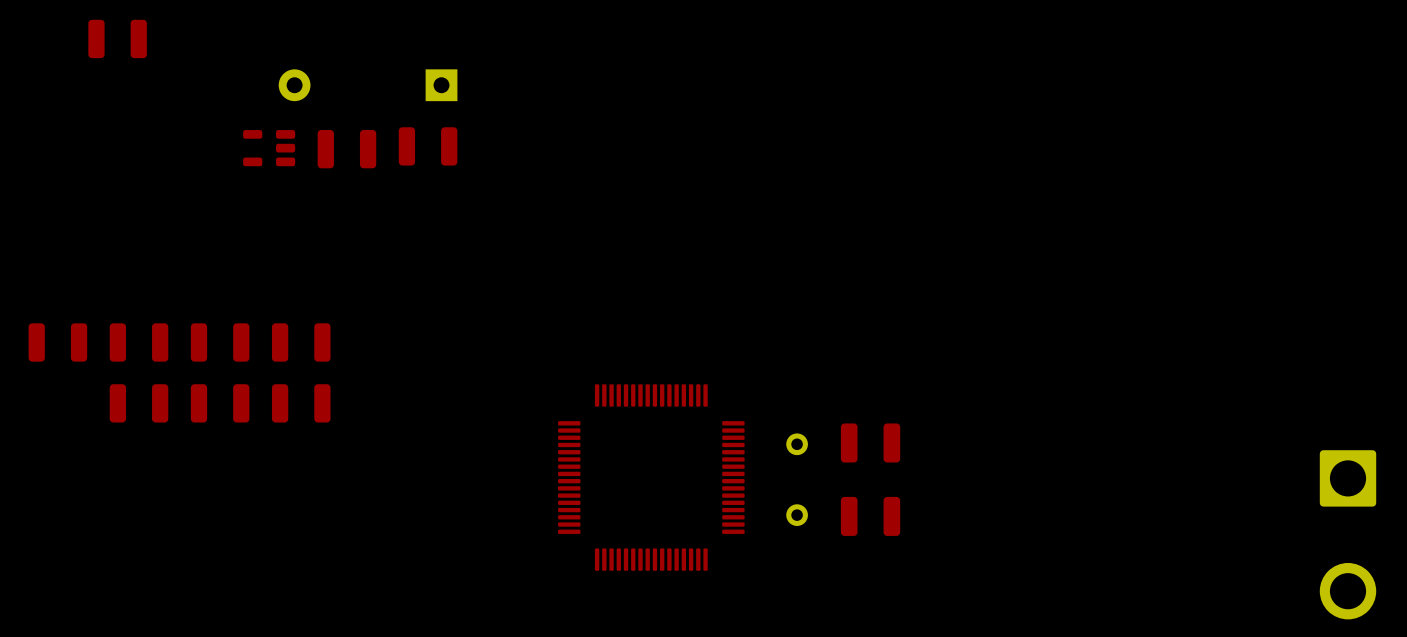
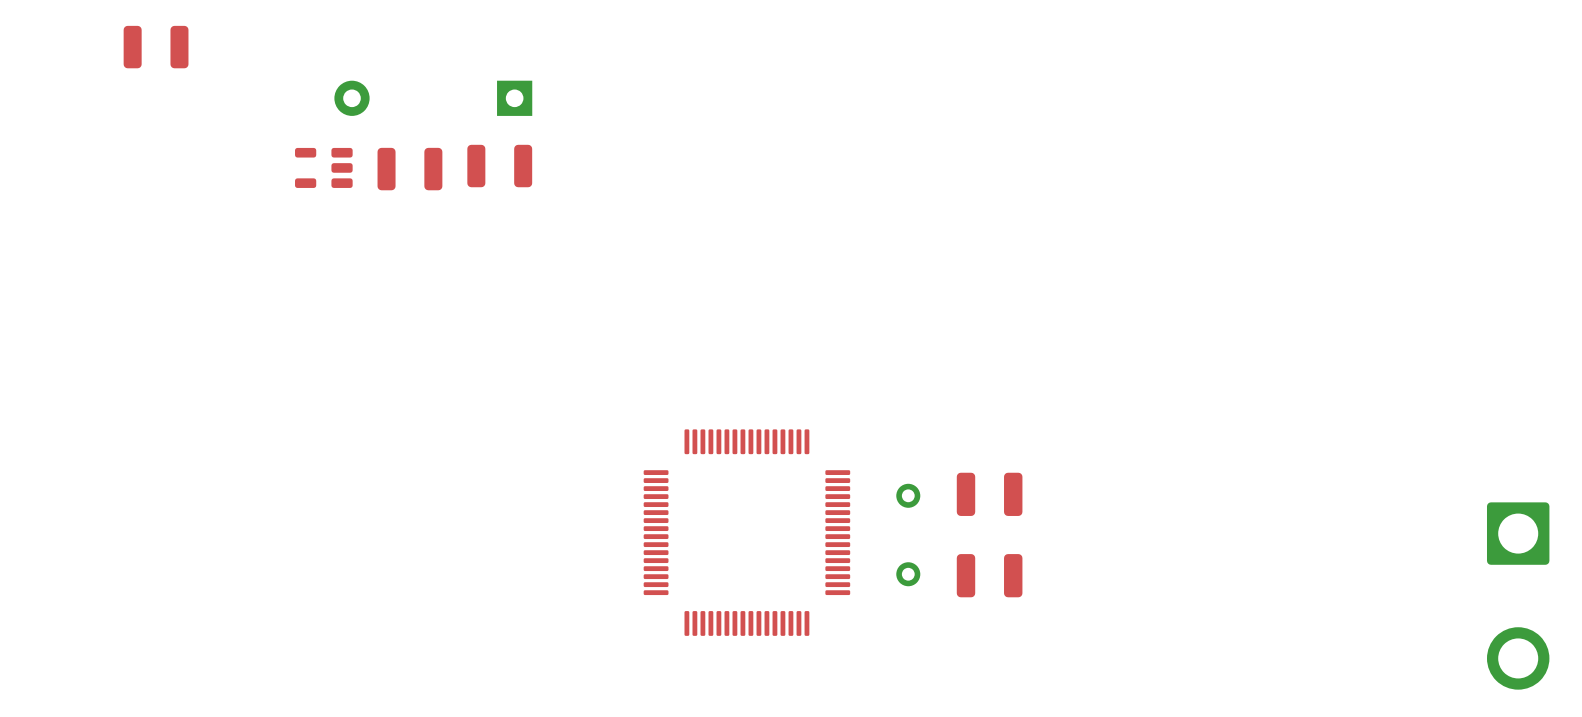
part: (57, 342) -> none
part: (139, 342) -> none
part: (220, 342) -> none
part: (301, 342) -> none
part: (139, 403) -> none
part: (220, 403) -> none
part: (301, 403) -> none

